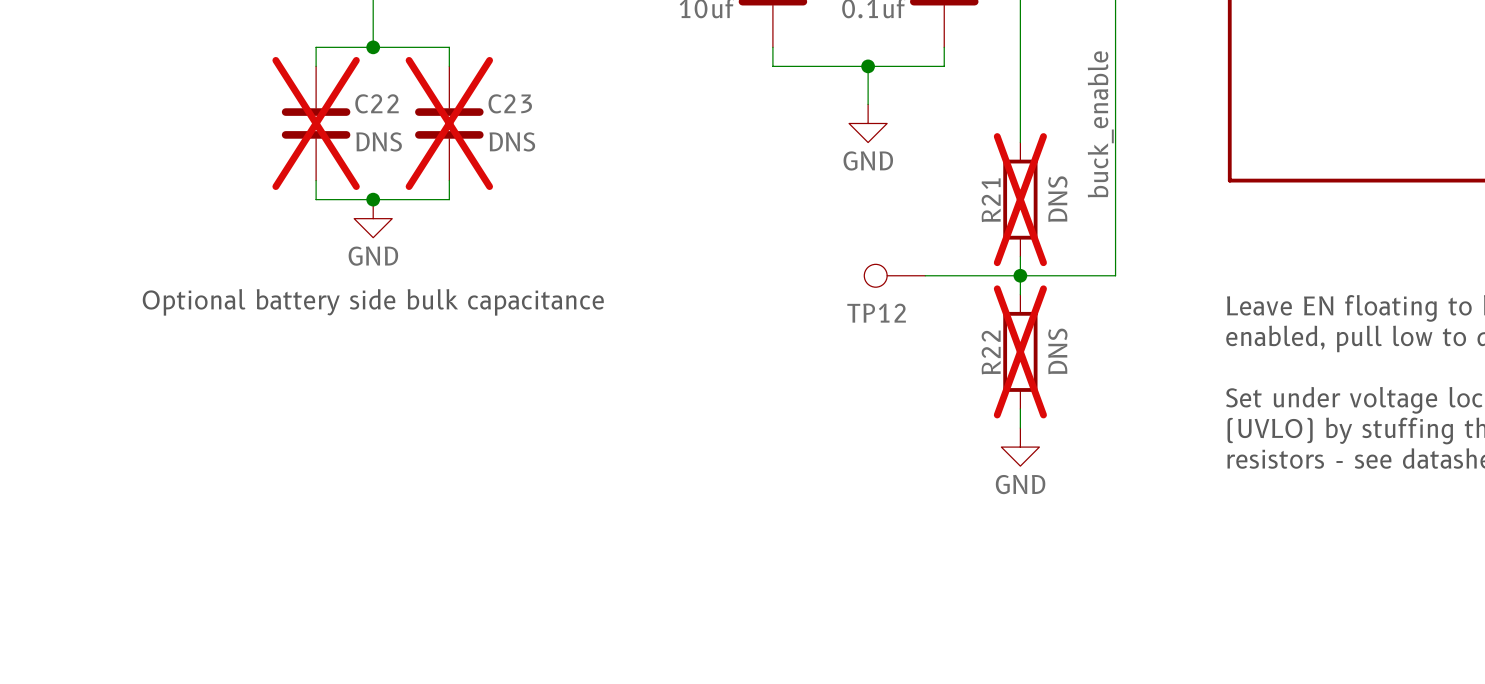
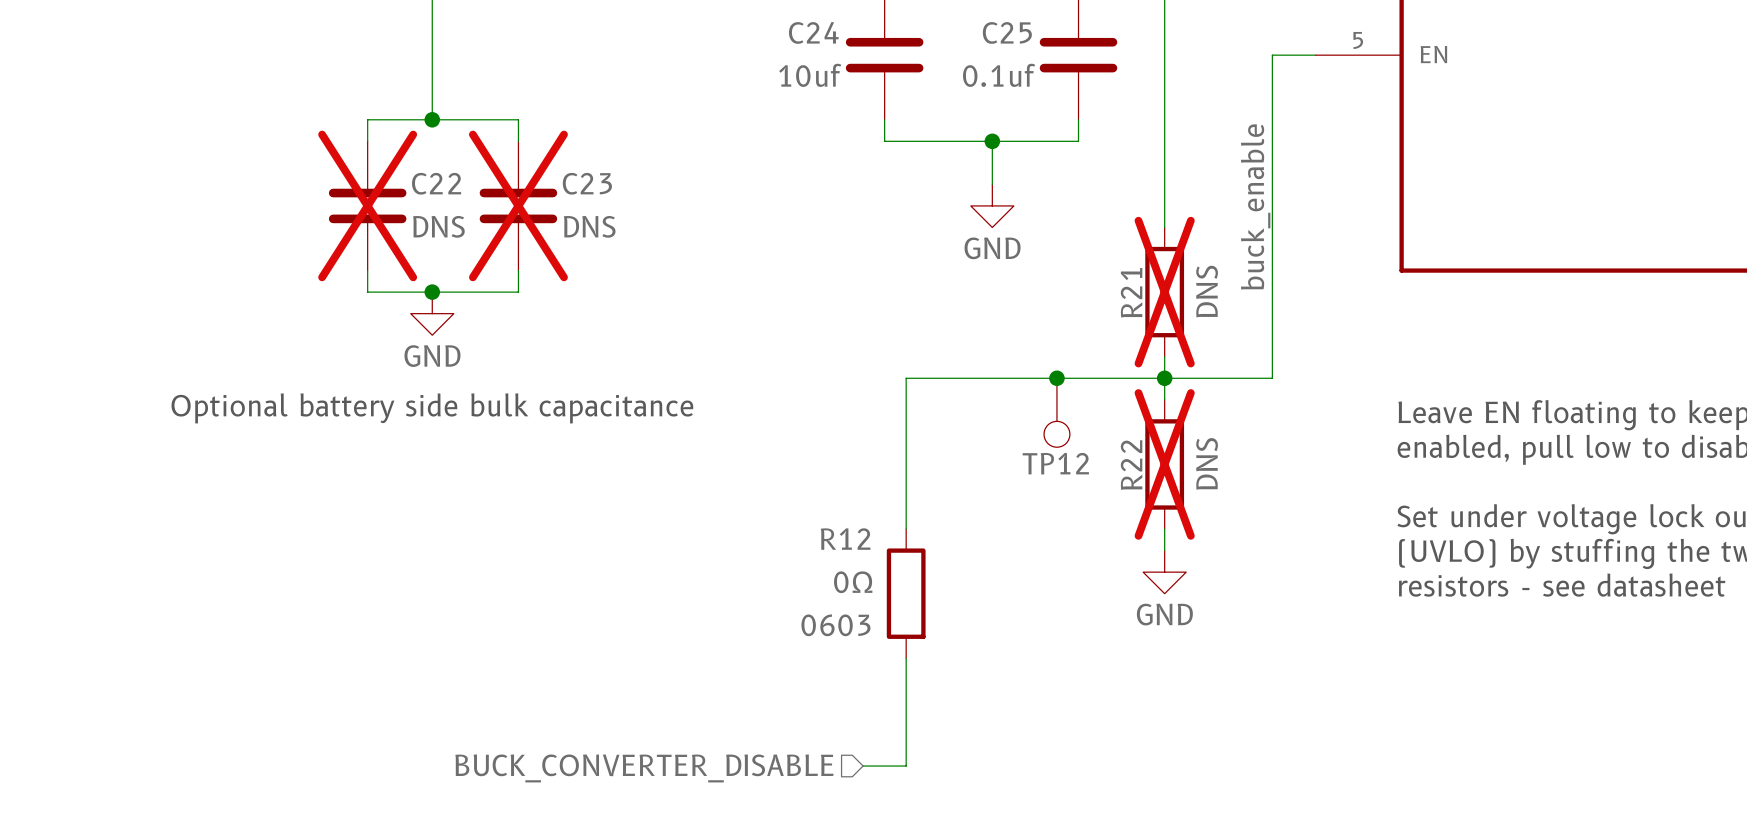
TP12 rotation: 0° (875, 275) -> 90° counterclockwise (1056, 434)
TP12 position: (894, 275) -> (1056, 412)
wire: none -> (1056, 378) (906, 378) (906, 529)
junction: none -> (1056, 378)
R12: none -> 0Ω (906, 593)
wire: none -> (906, 658) (906, 766) (863, 766)
hierarchical label: none -> BUCK_CONVERTER_DISABLE (644, 768)

